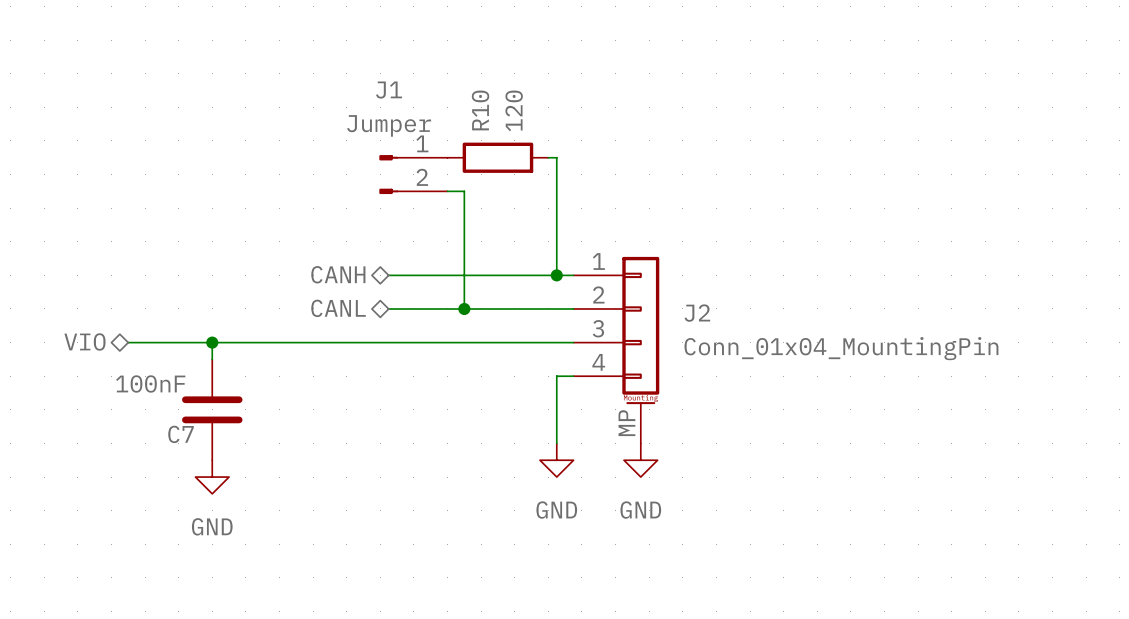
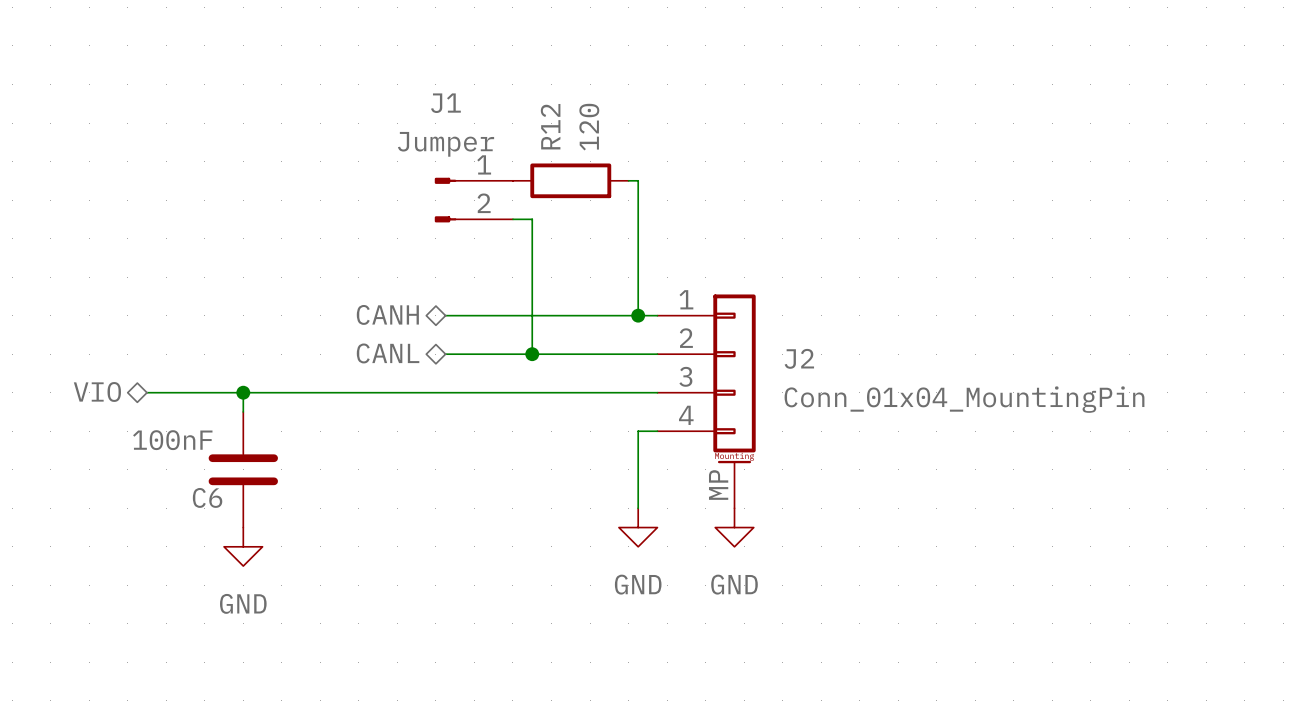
R10 name: R10 (480, 110) -> R12 (550, 126)
C7 name: C7 (181, 434) -> C6 (207, 497)

